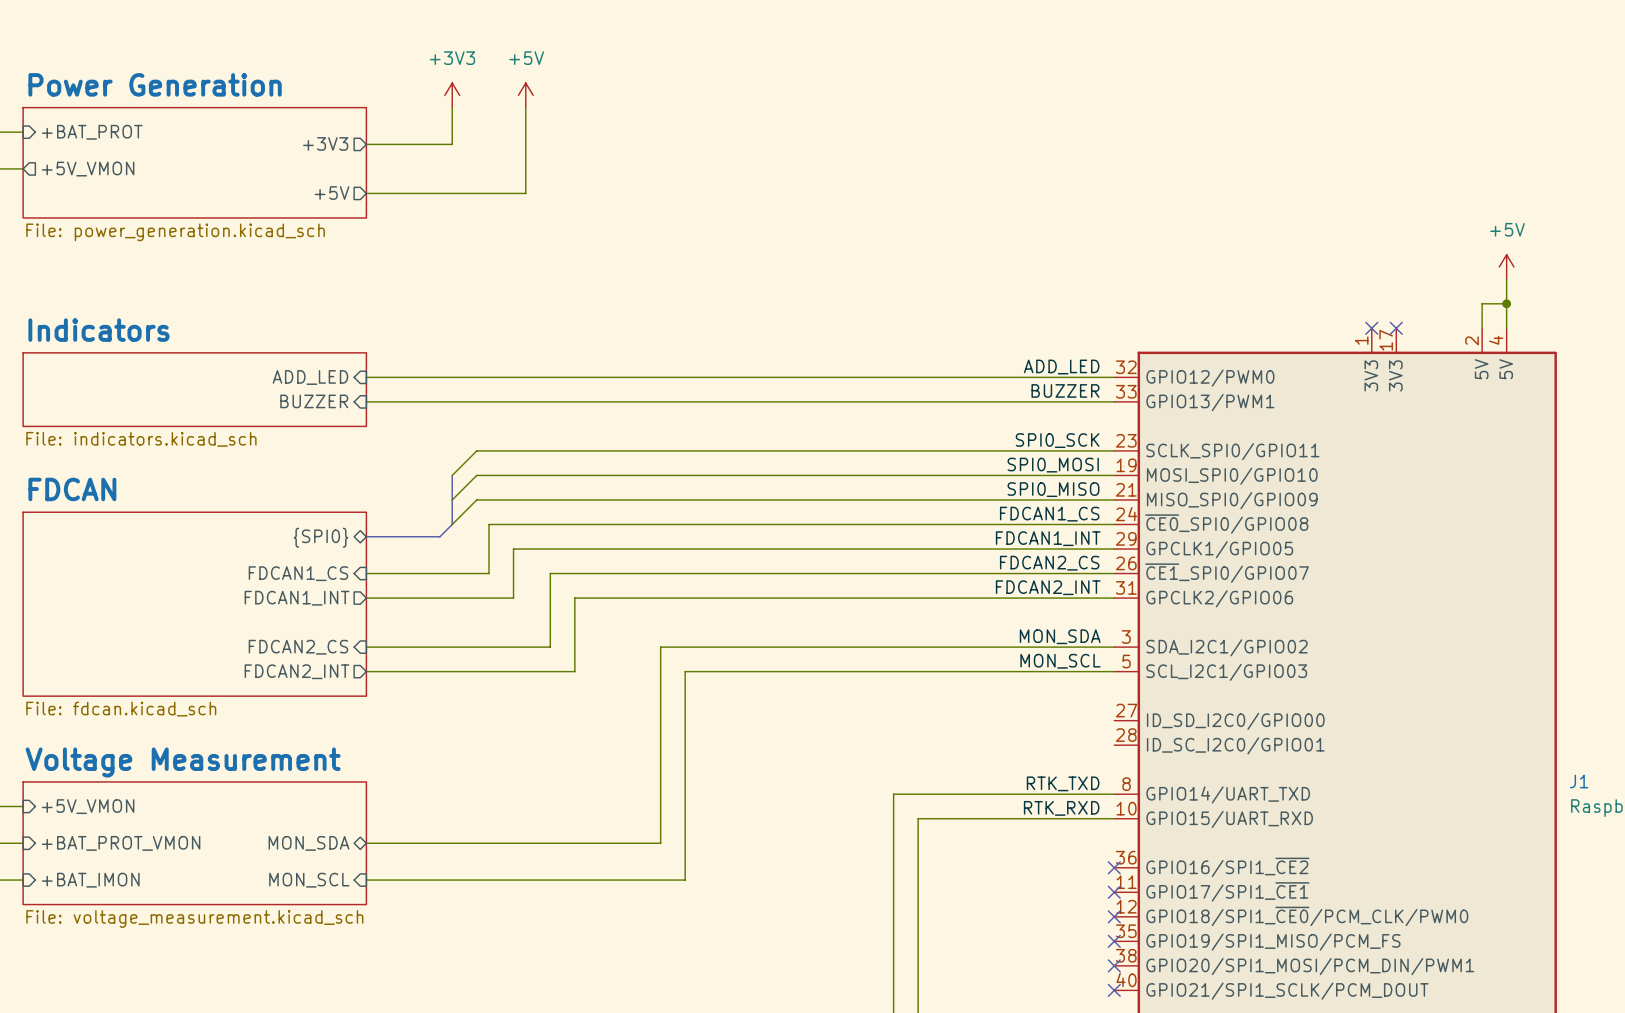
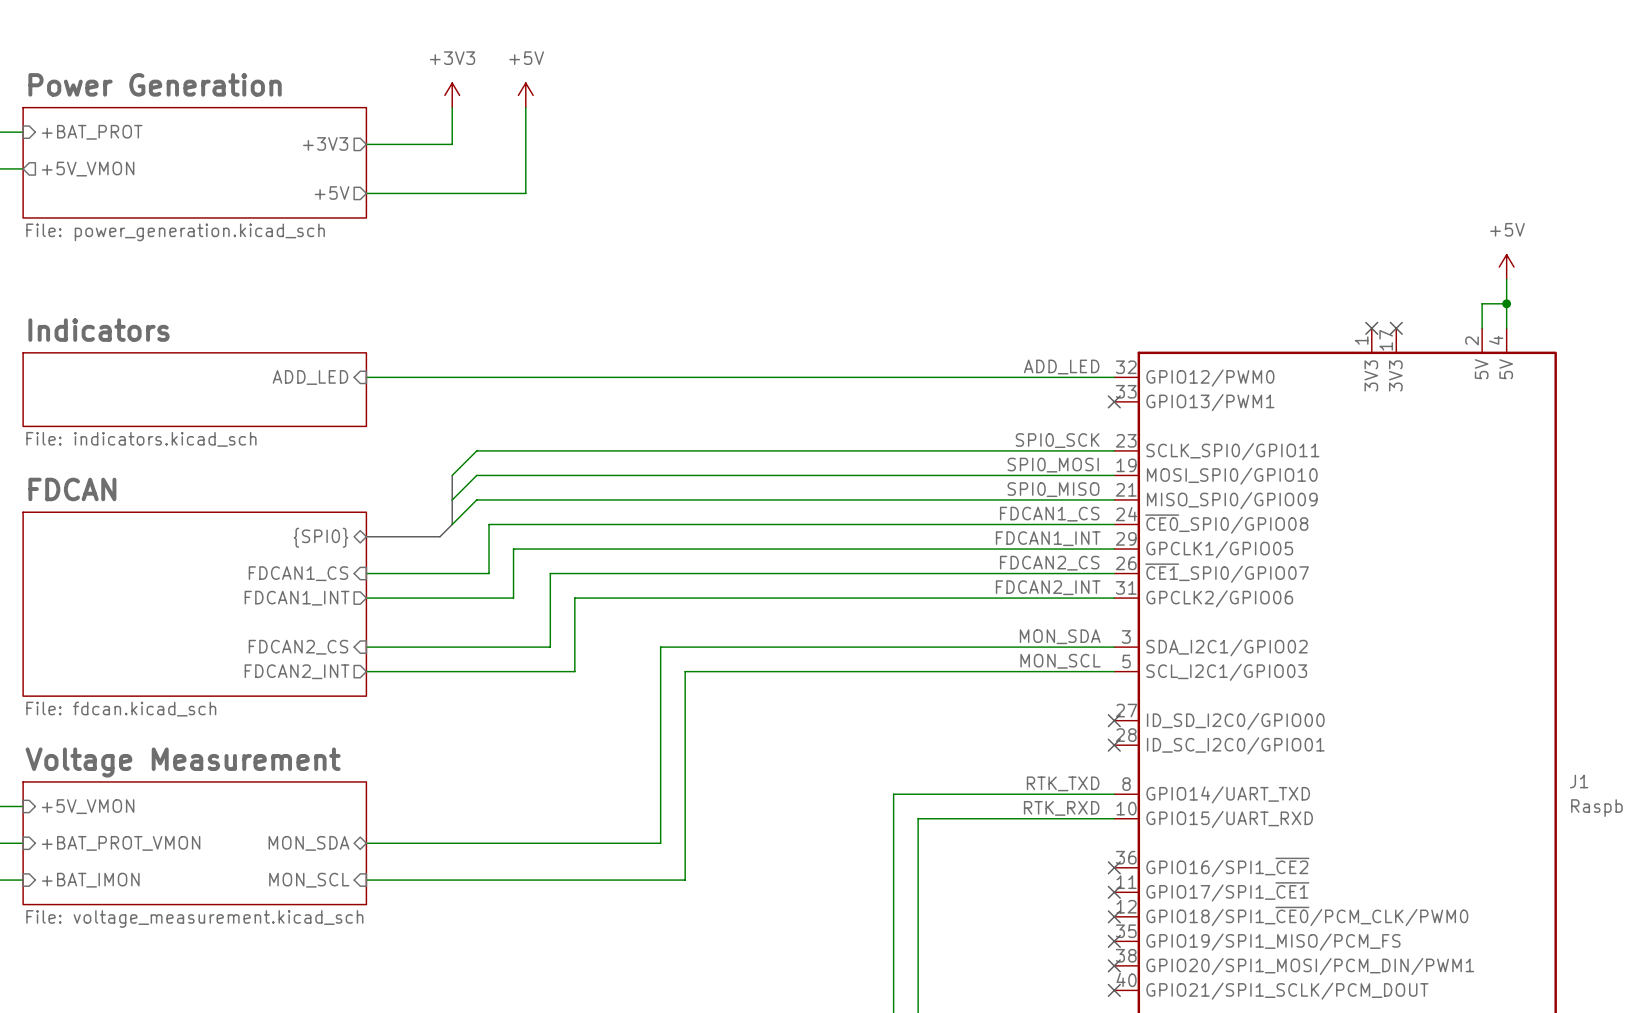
label: BUZZER (1065, 390) -> none
sheet pin: BUZZER (314, 401) -> none
wire: (366, 401) (1114, 401) -> none
no-connect mark: none -> (1114, 401)
no-connect mark: none -> (1114, 720)
no-connect mark: none -> (1114, 745)

